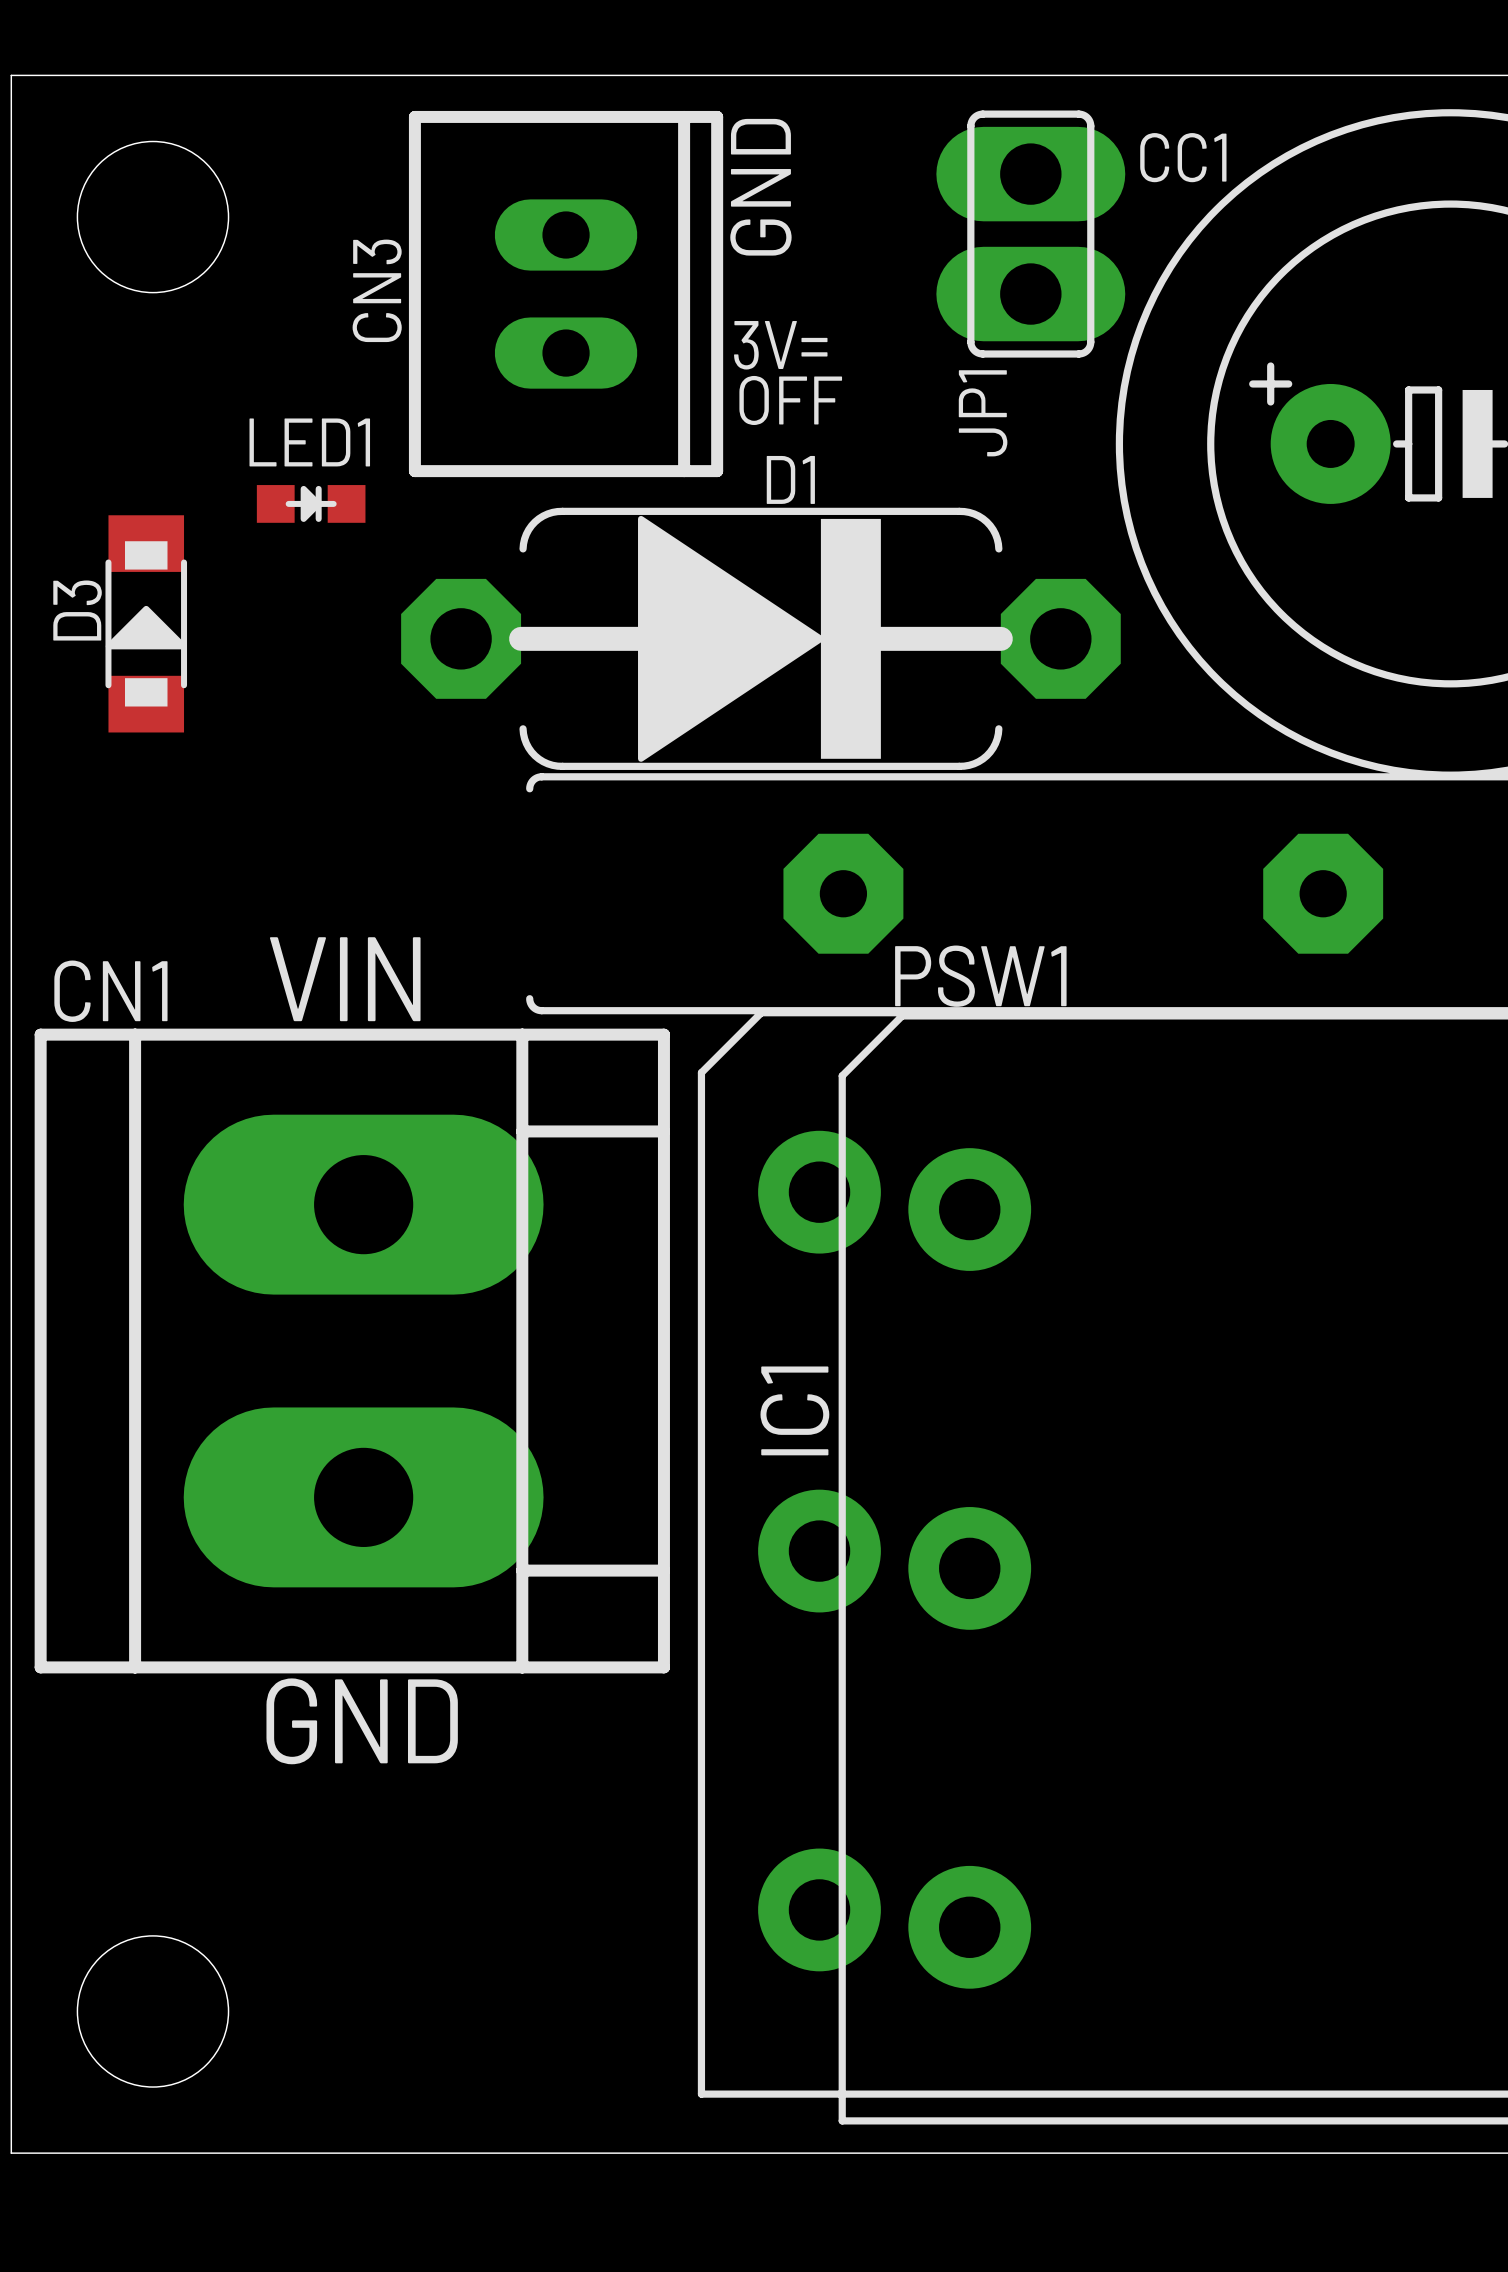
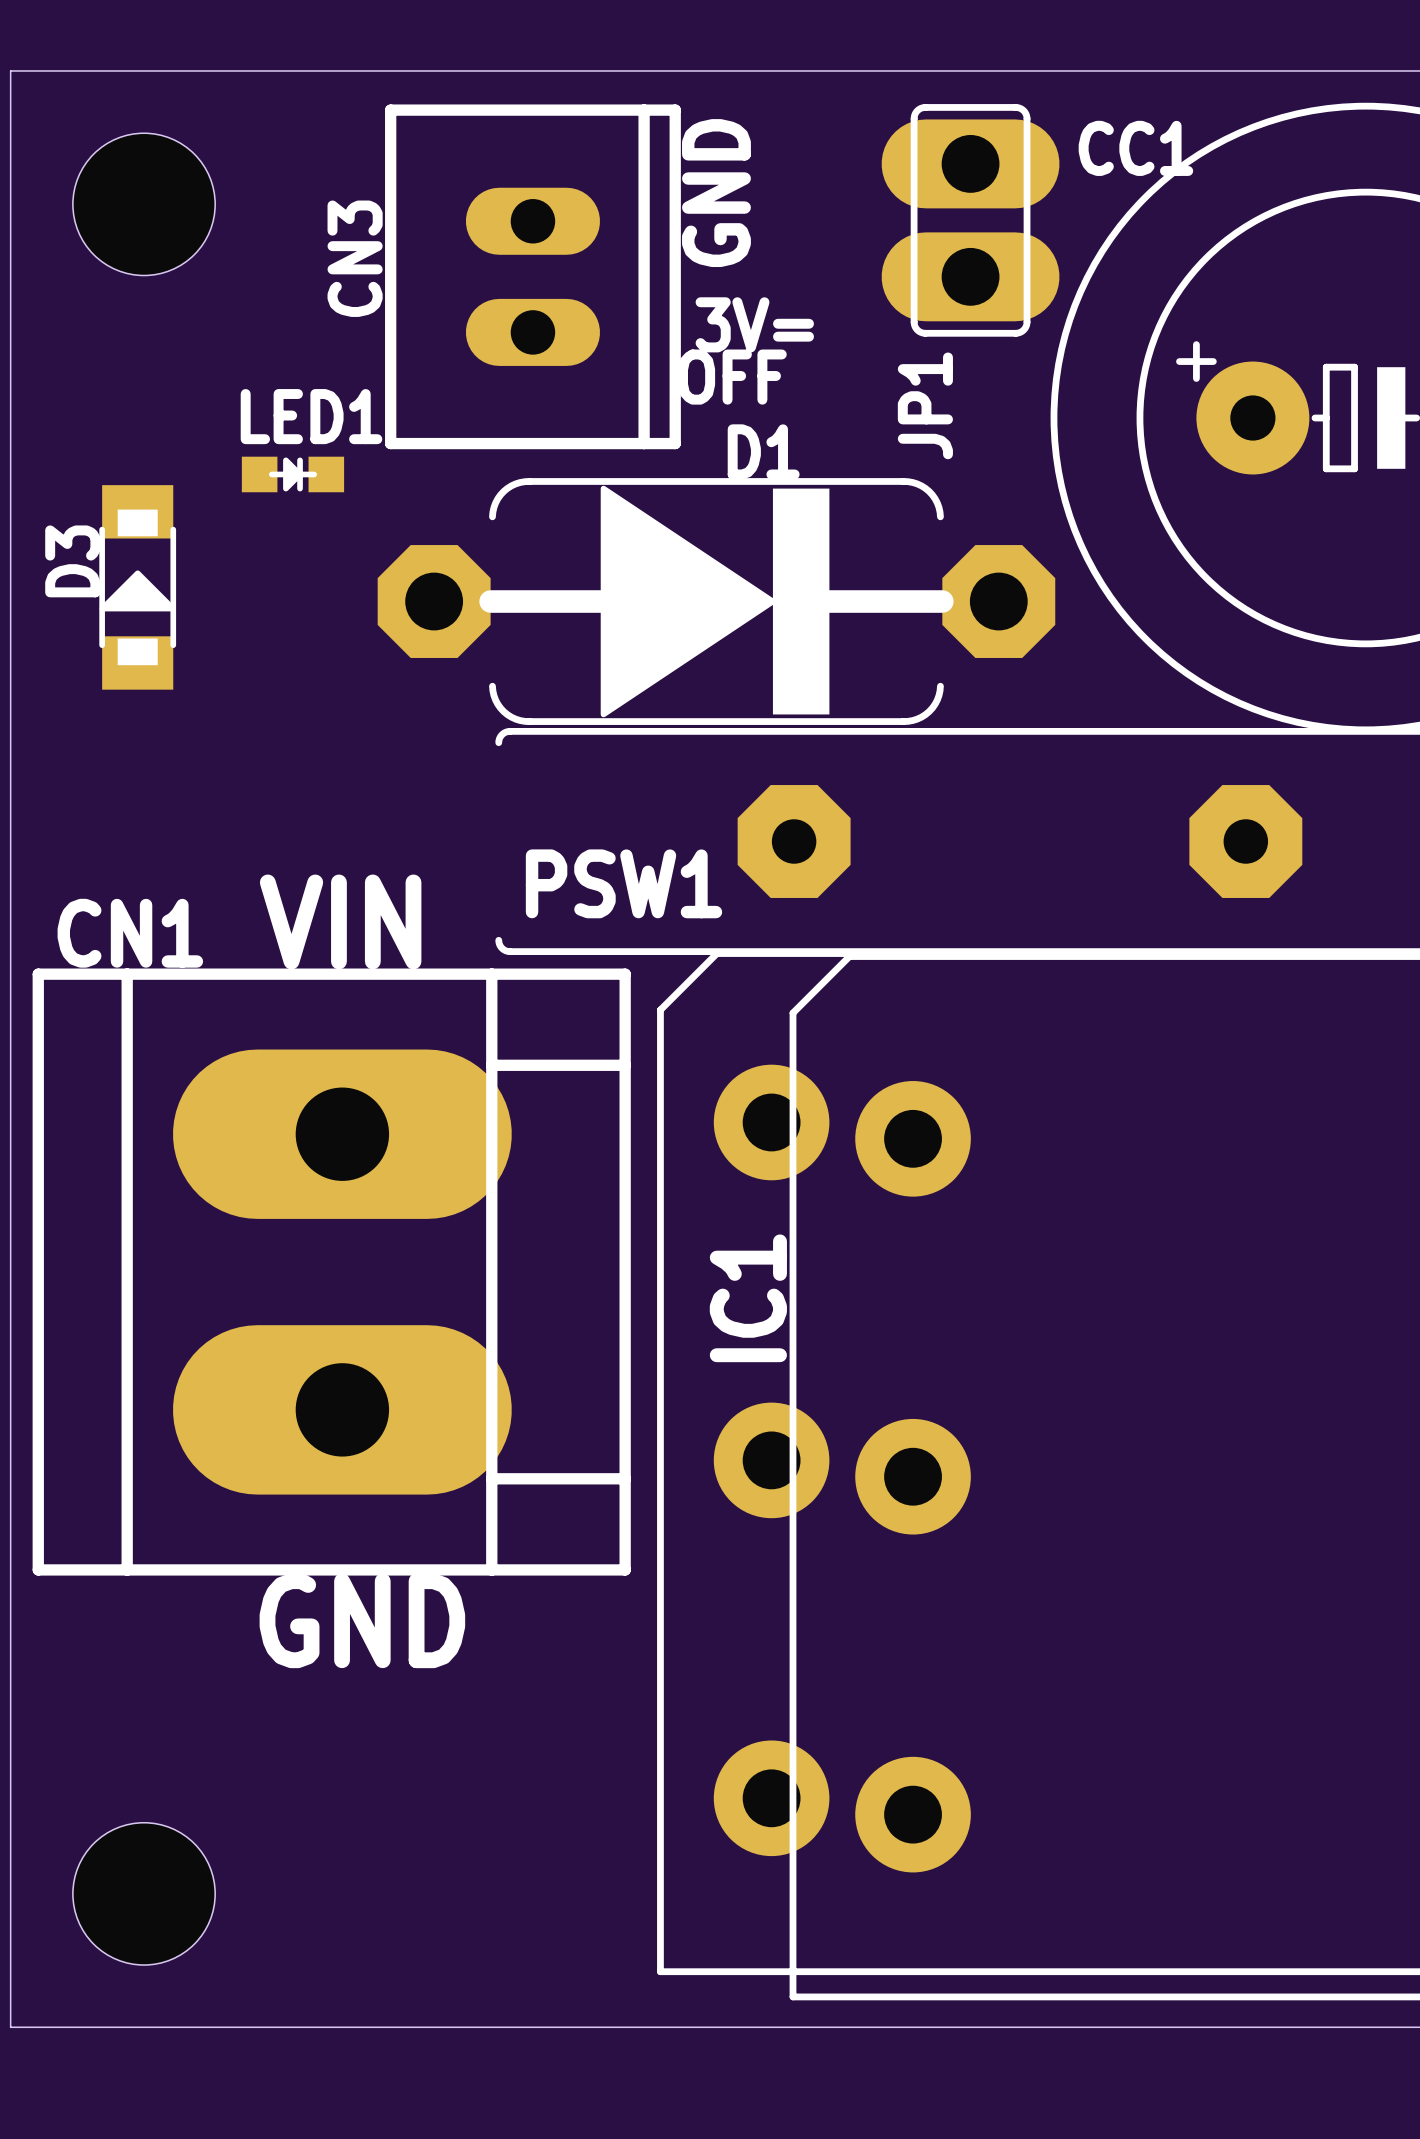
PSW1 name position: PSW1 (980, 976) -> PSW1 (624, 883)

